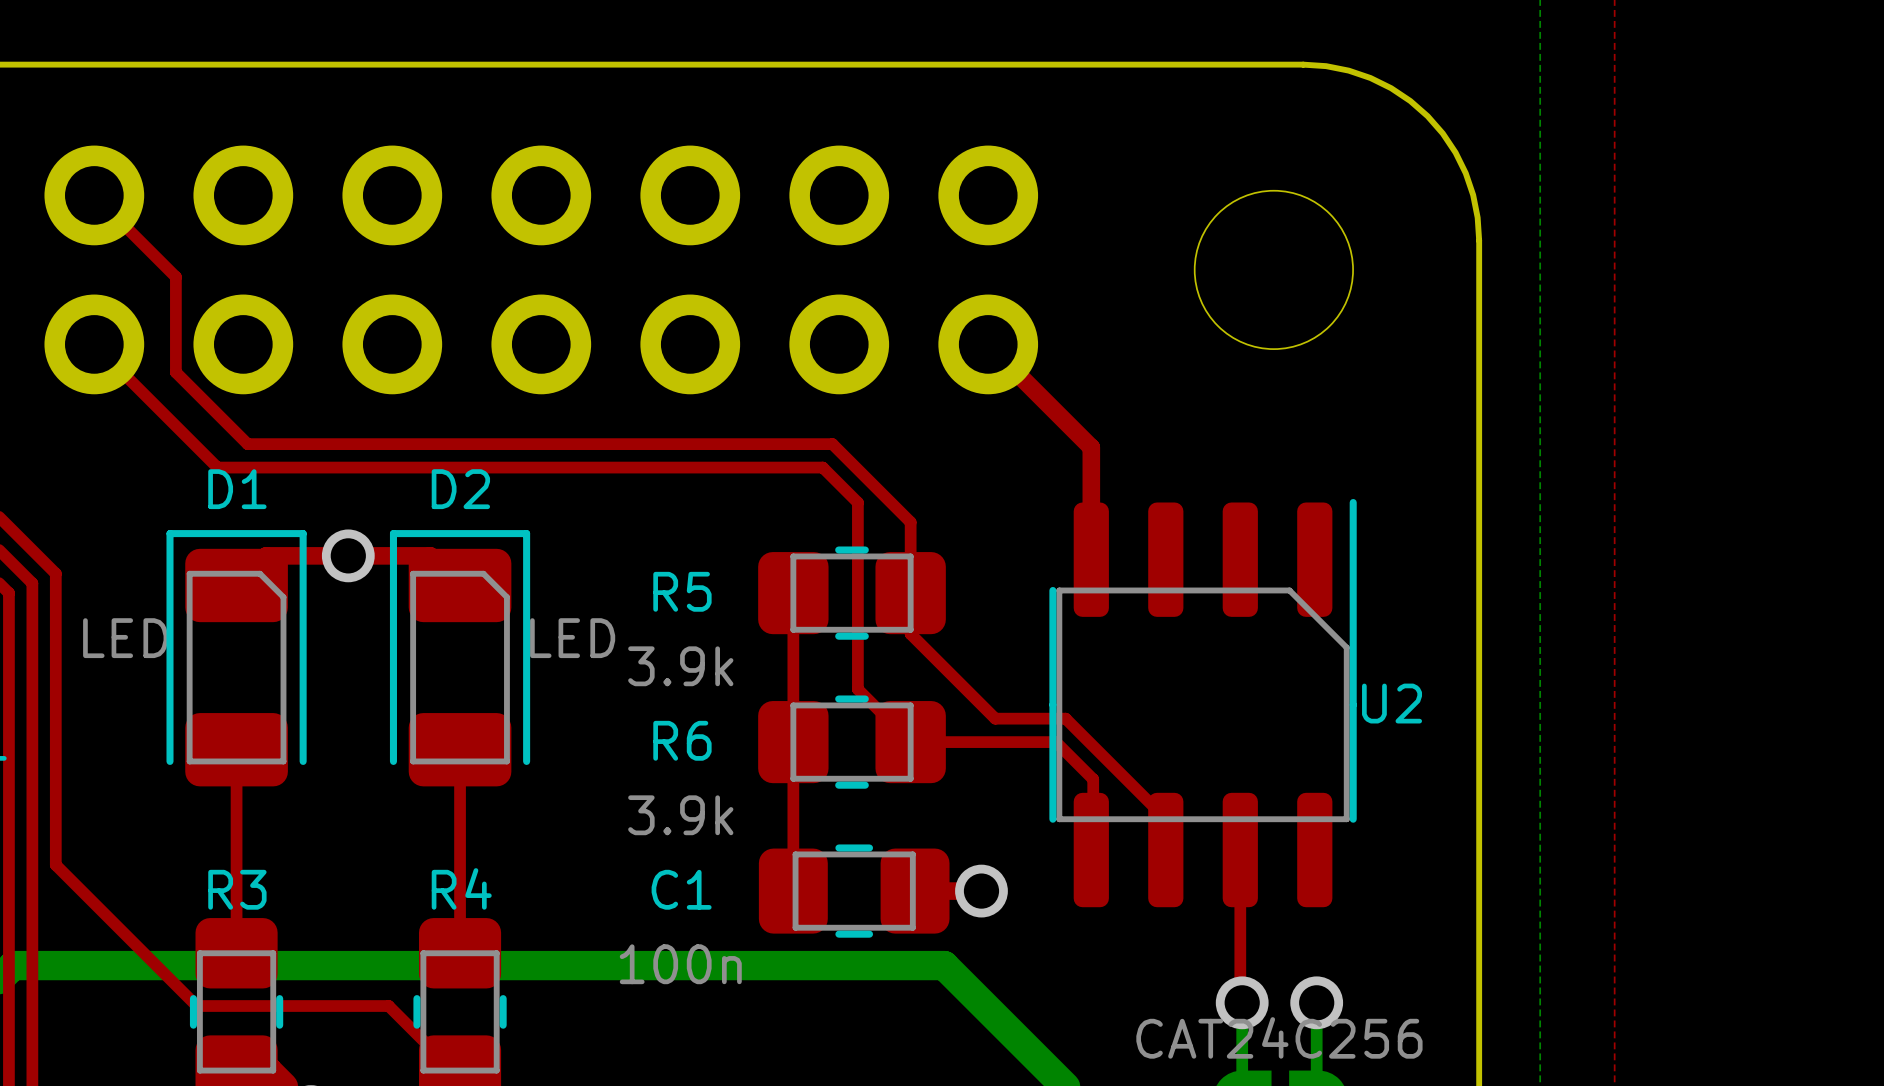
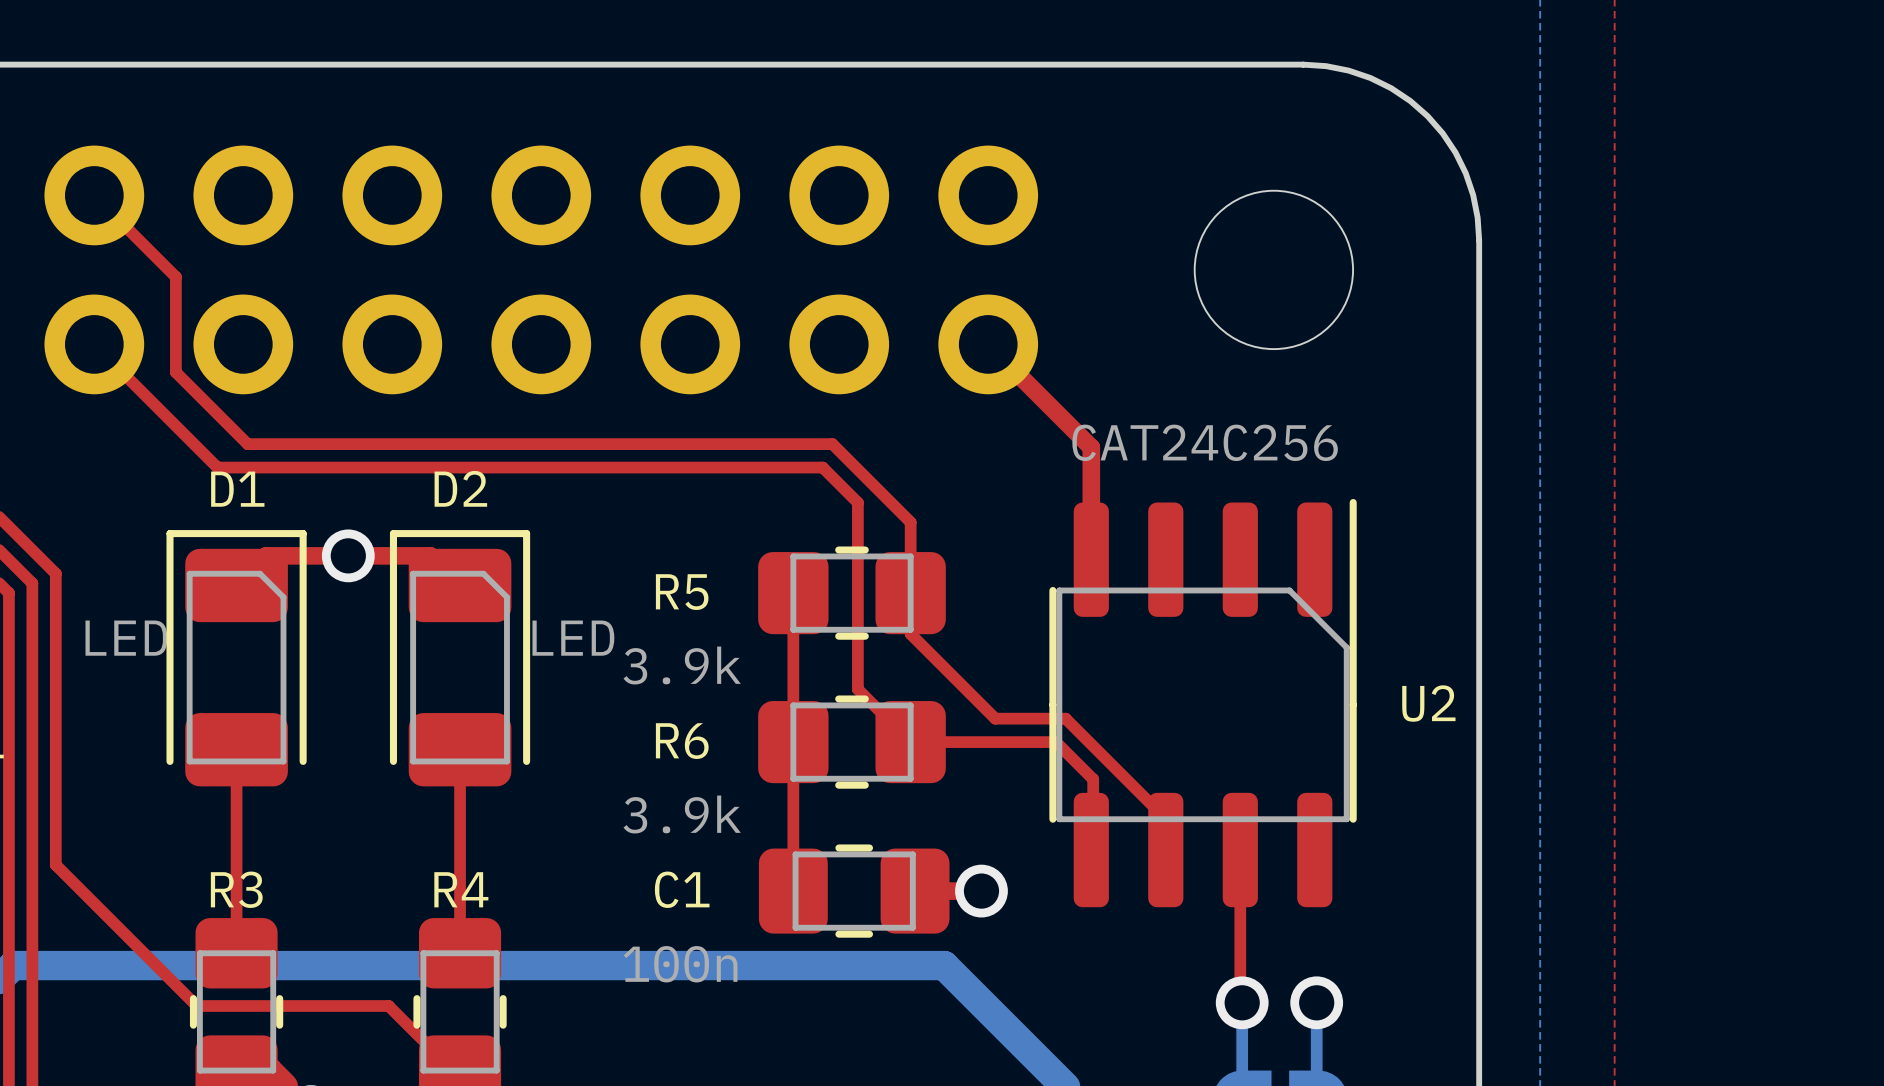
U2 name position: U2 (1392, 703) -> U2 (1428, 703)
U2 value position: CAT24C256 (1279, 1037) -> CAT24C256 (1205, 442)

